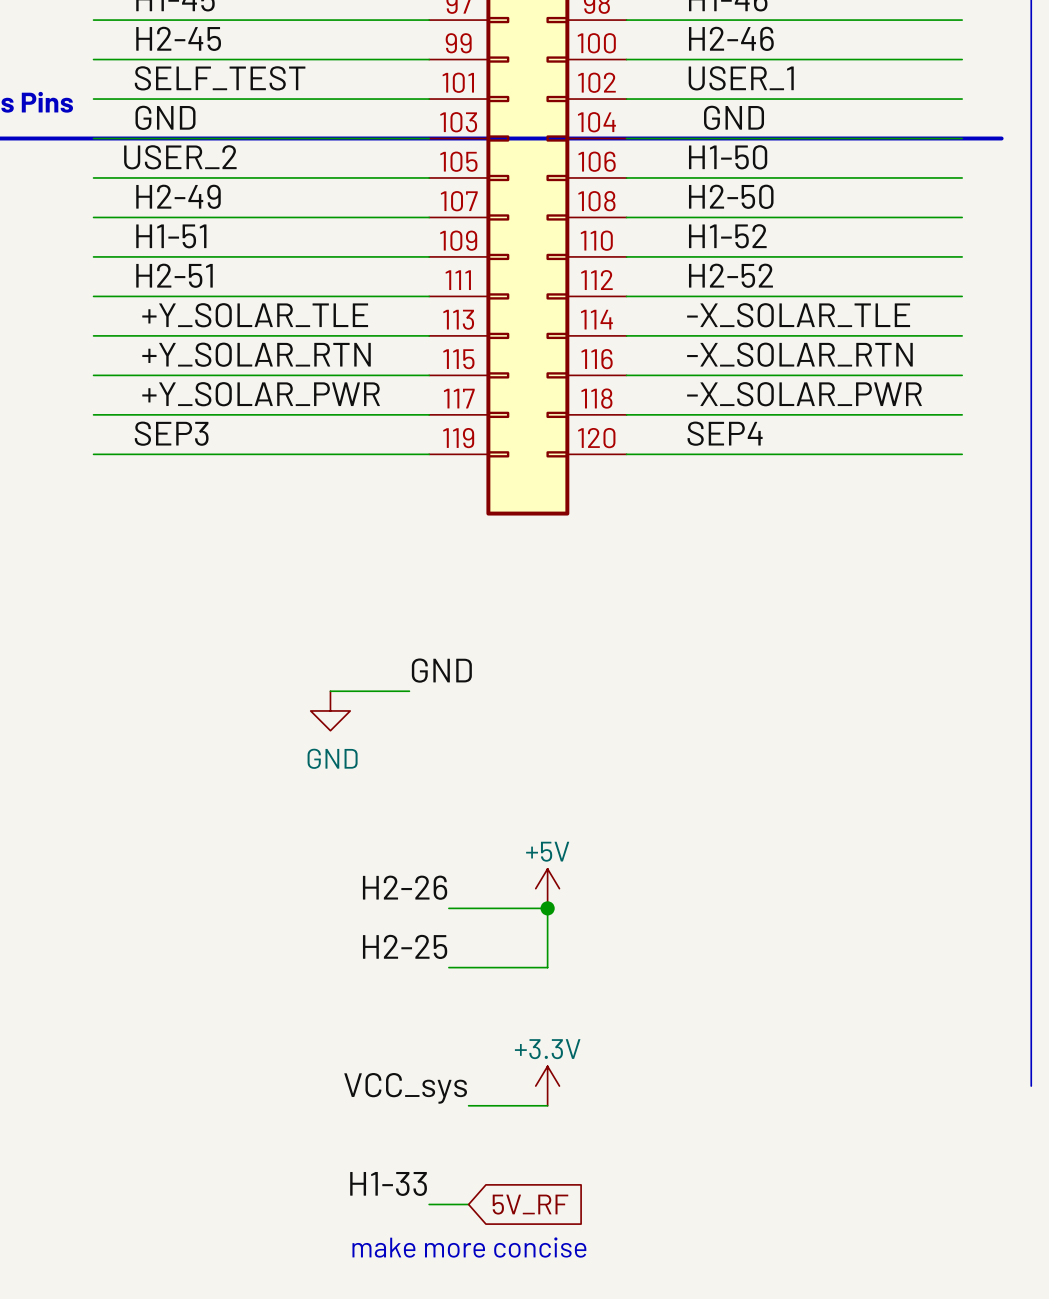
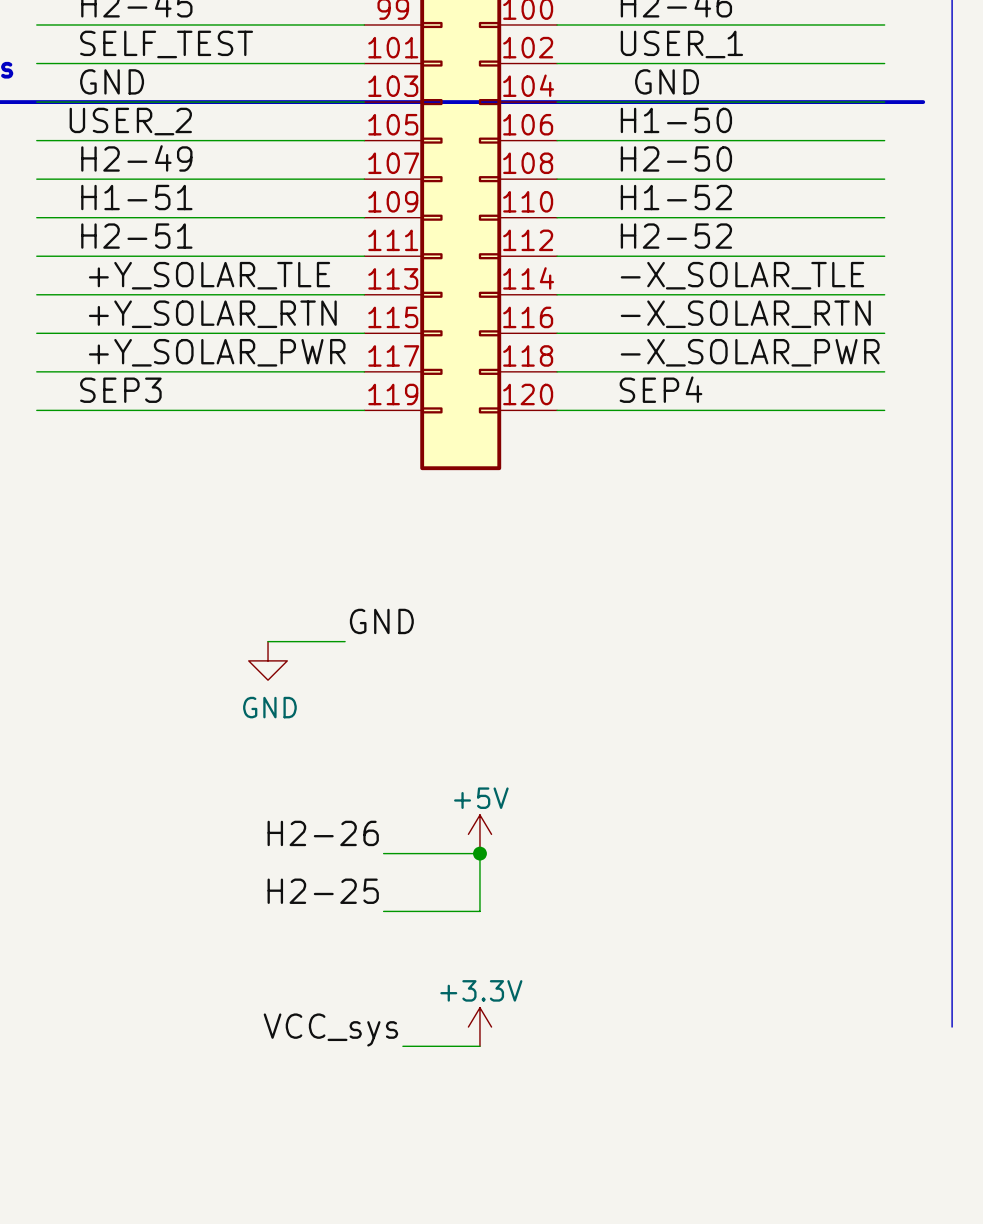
label: H1-33 (388, 1183) -> none
wire: (429, 1204) (468, 1204) -> none
global label: 5V_RF (530, 1204) -> none
text: make more concise (469, 1247) -> none

